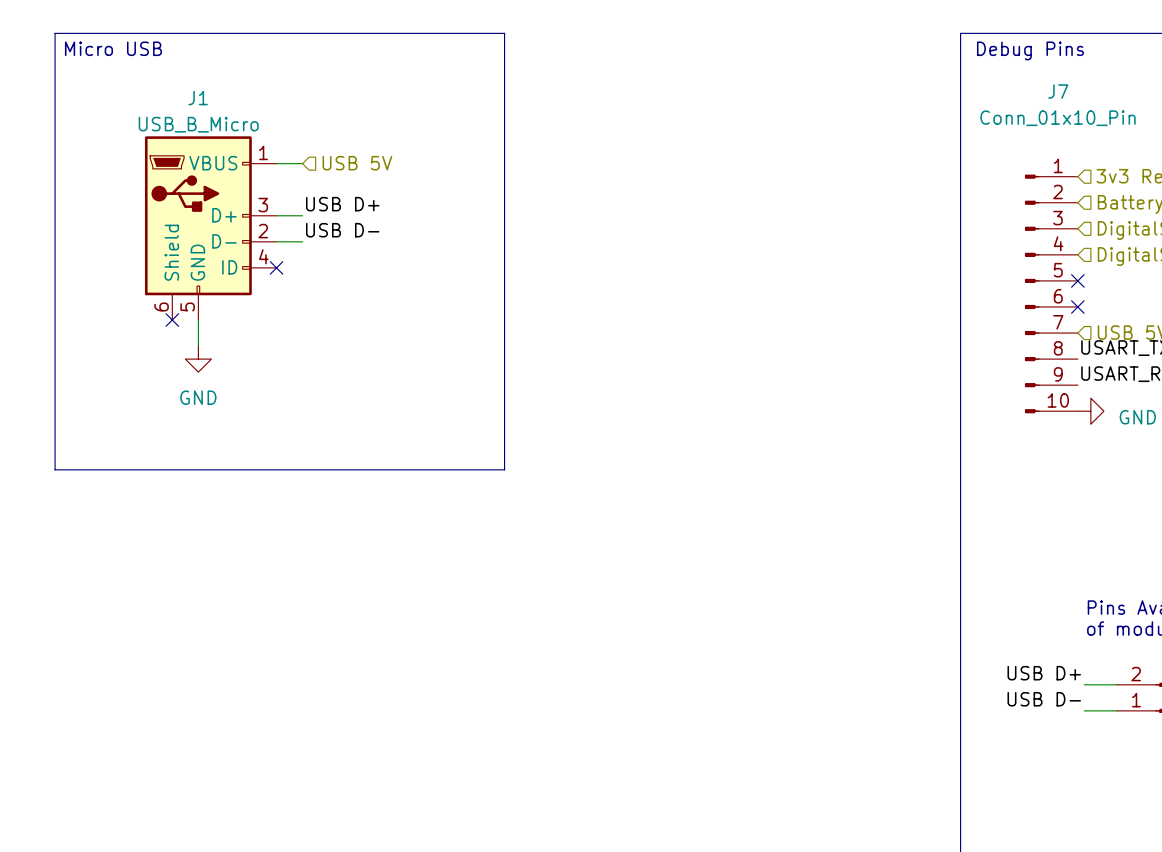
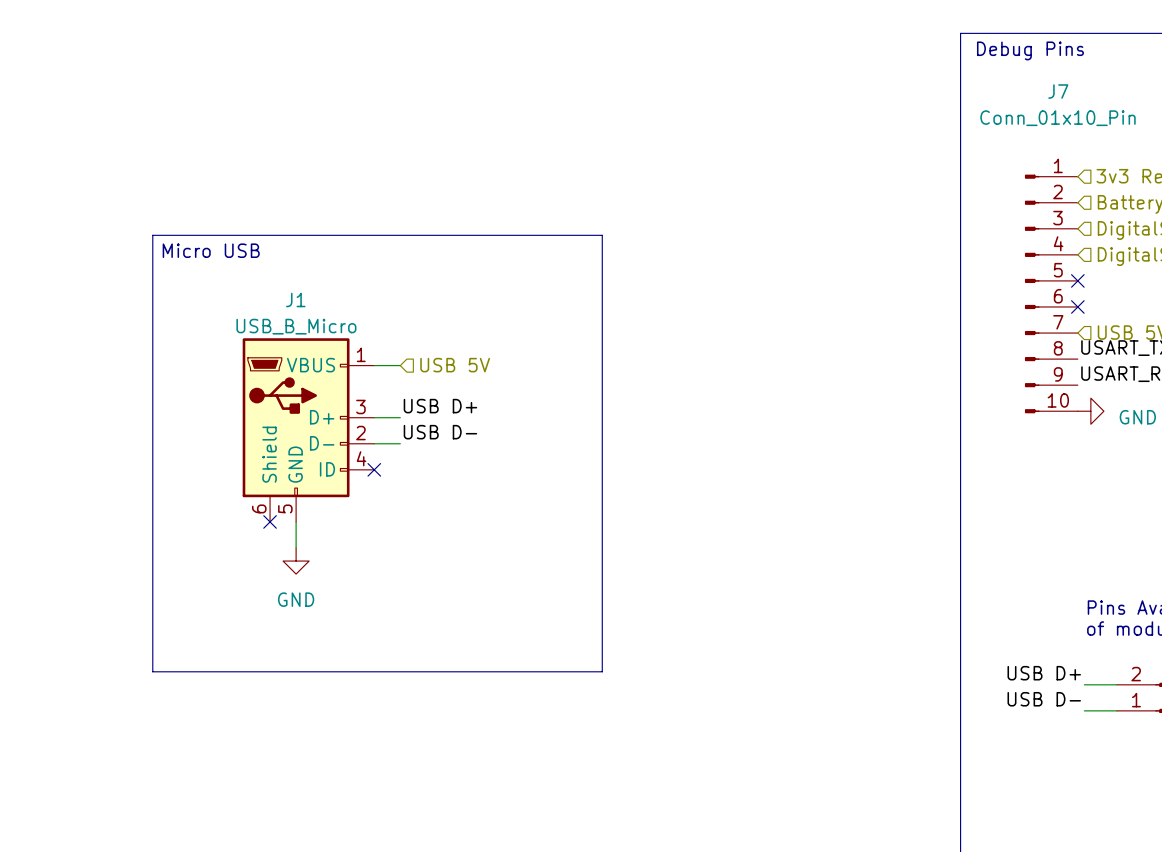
line: (55, 33) (504, 33) (504, 469) (55, 469) (55, 33) -> (152, 235) (602, 235) (602, 671) (152, 671) (152, 235)
text position: Micro USB (113, 48) -> Micro USB (211, 250)
wire: (276, 163) (302, 163) -> (374, 365) (400, 365)
hierarchical label position: USB 5V (357, 163) -> USB 5V (455, 365)
label position: USB D+ (342, 204) -> USB D+ (440, 406)
wire: (276, 215) (302, 215) -> (374, 417) (400, 417)
J1 position: (210, 228) -> (308, 430)
label position: USB D- (342, 230) -> USB D- (440, 432)
wire: (276, 241) (302, 241) -> (374, 443) (400, 443)
no-connect mark: (276, 267) -> none
no-connect mark: (172, 320) -> none
wire: (198, 320) (198, 346) -> (296, 521) (296, 548)
power symbol position: GND (198, 359) -> GND (296, 561)
no-connect mark: none -> (374, 469)
no-connect mark: none -> (270, 521)

